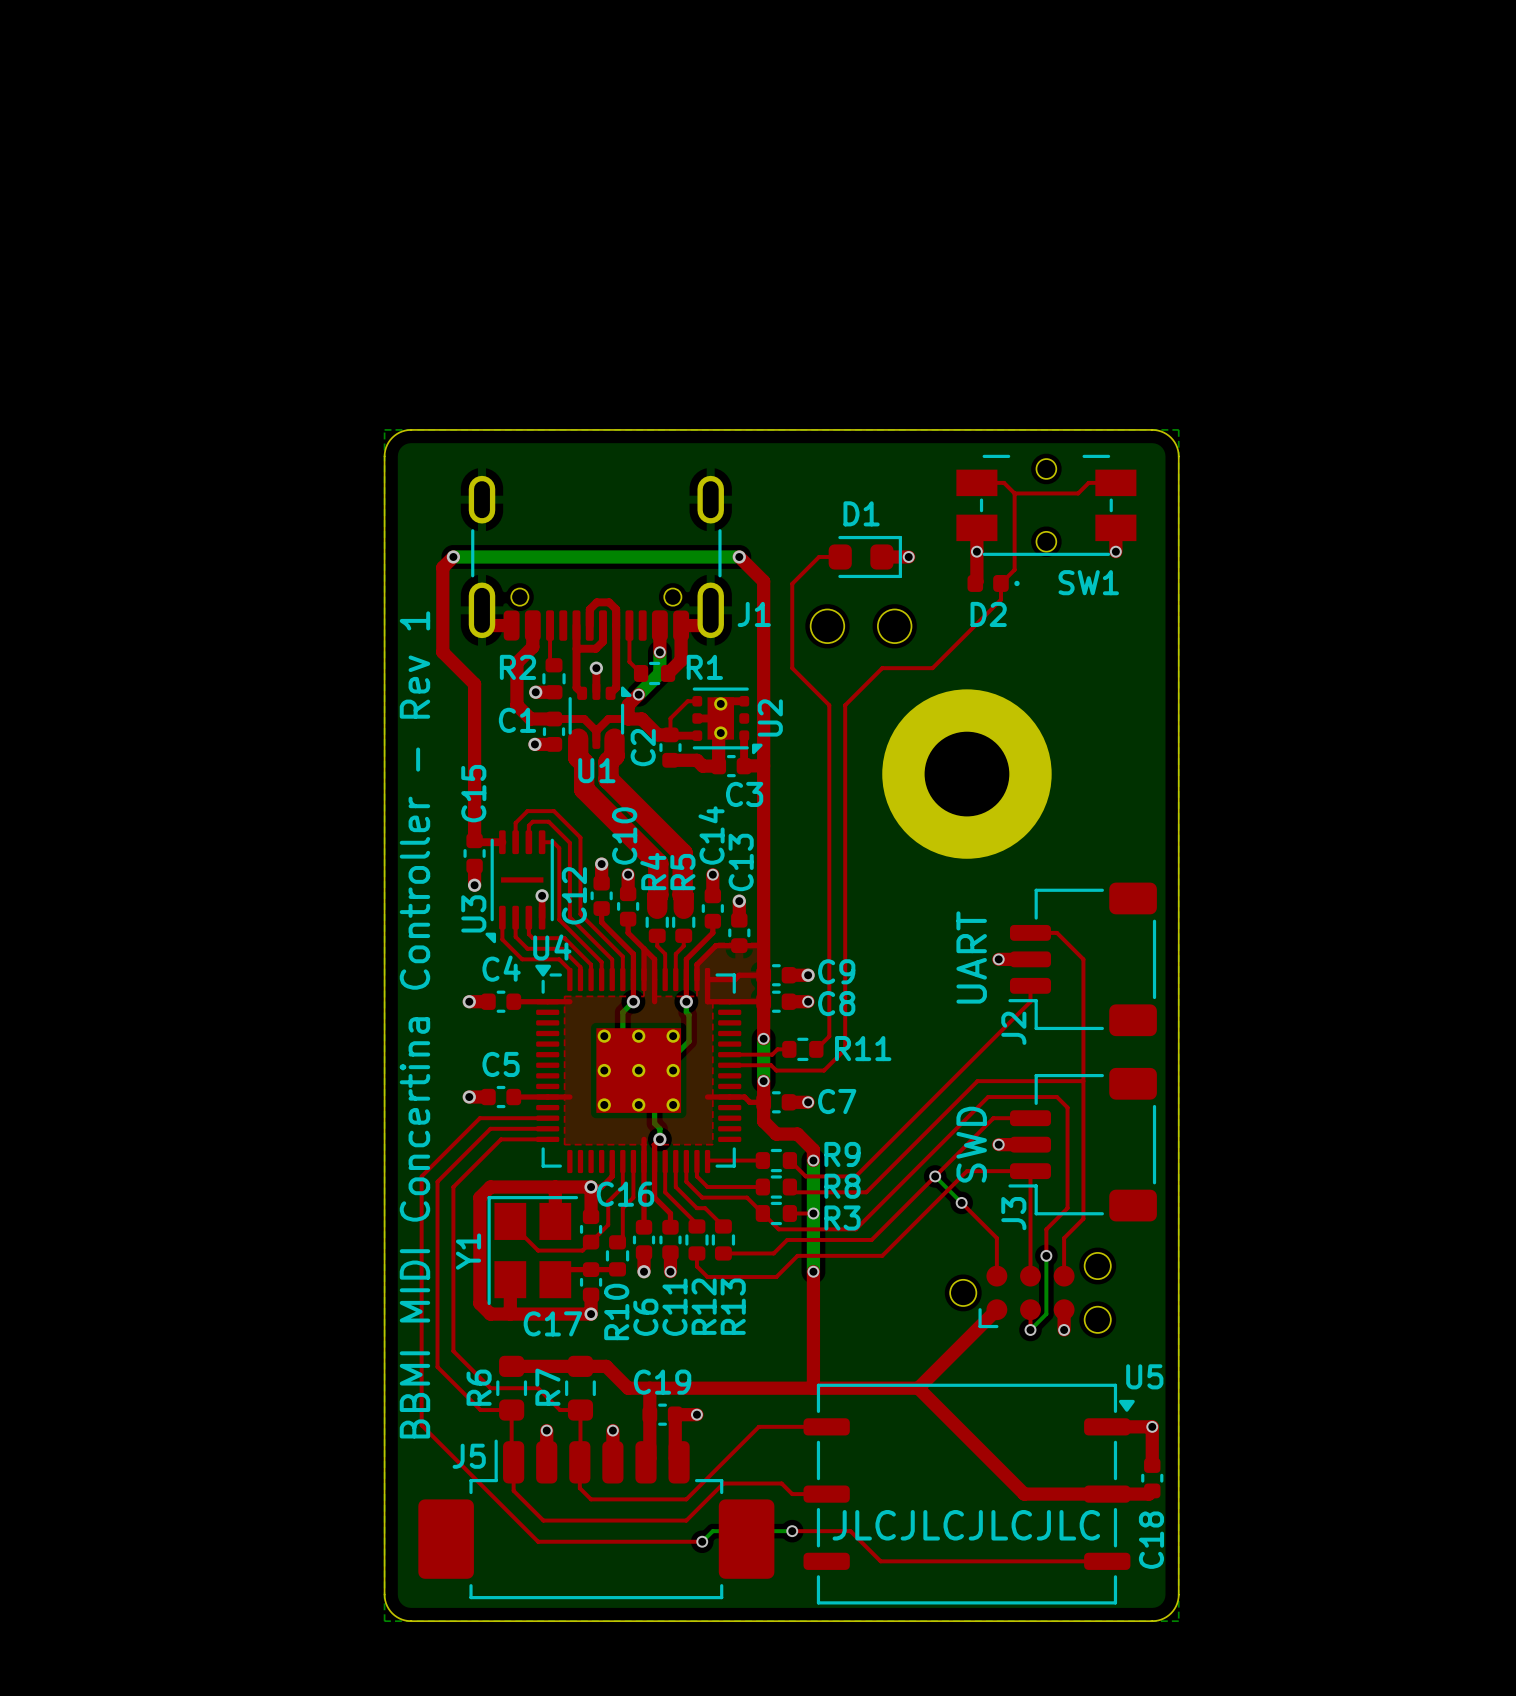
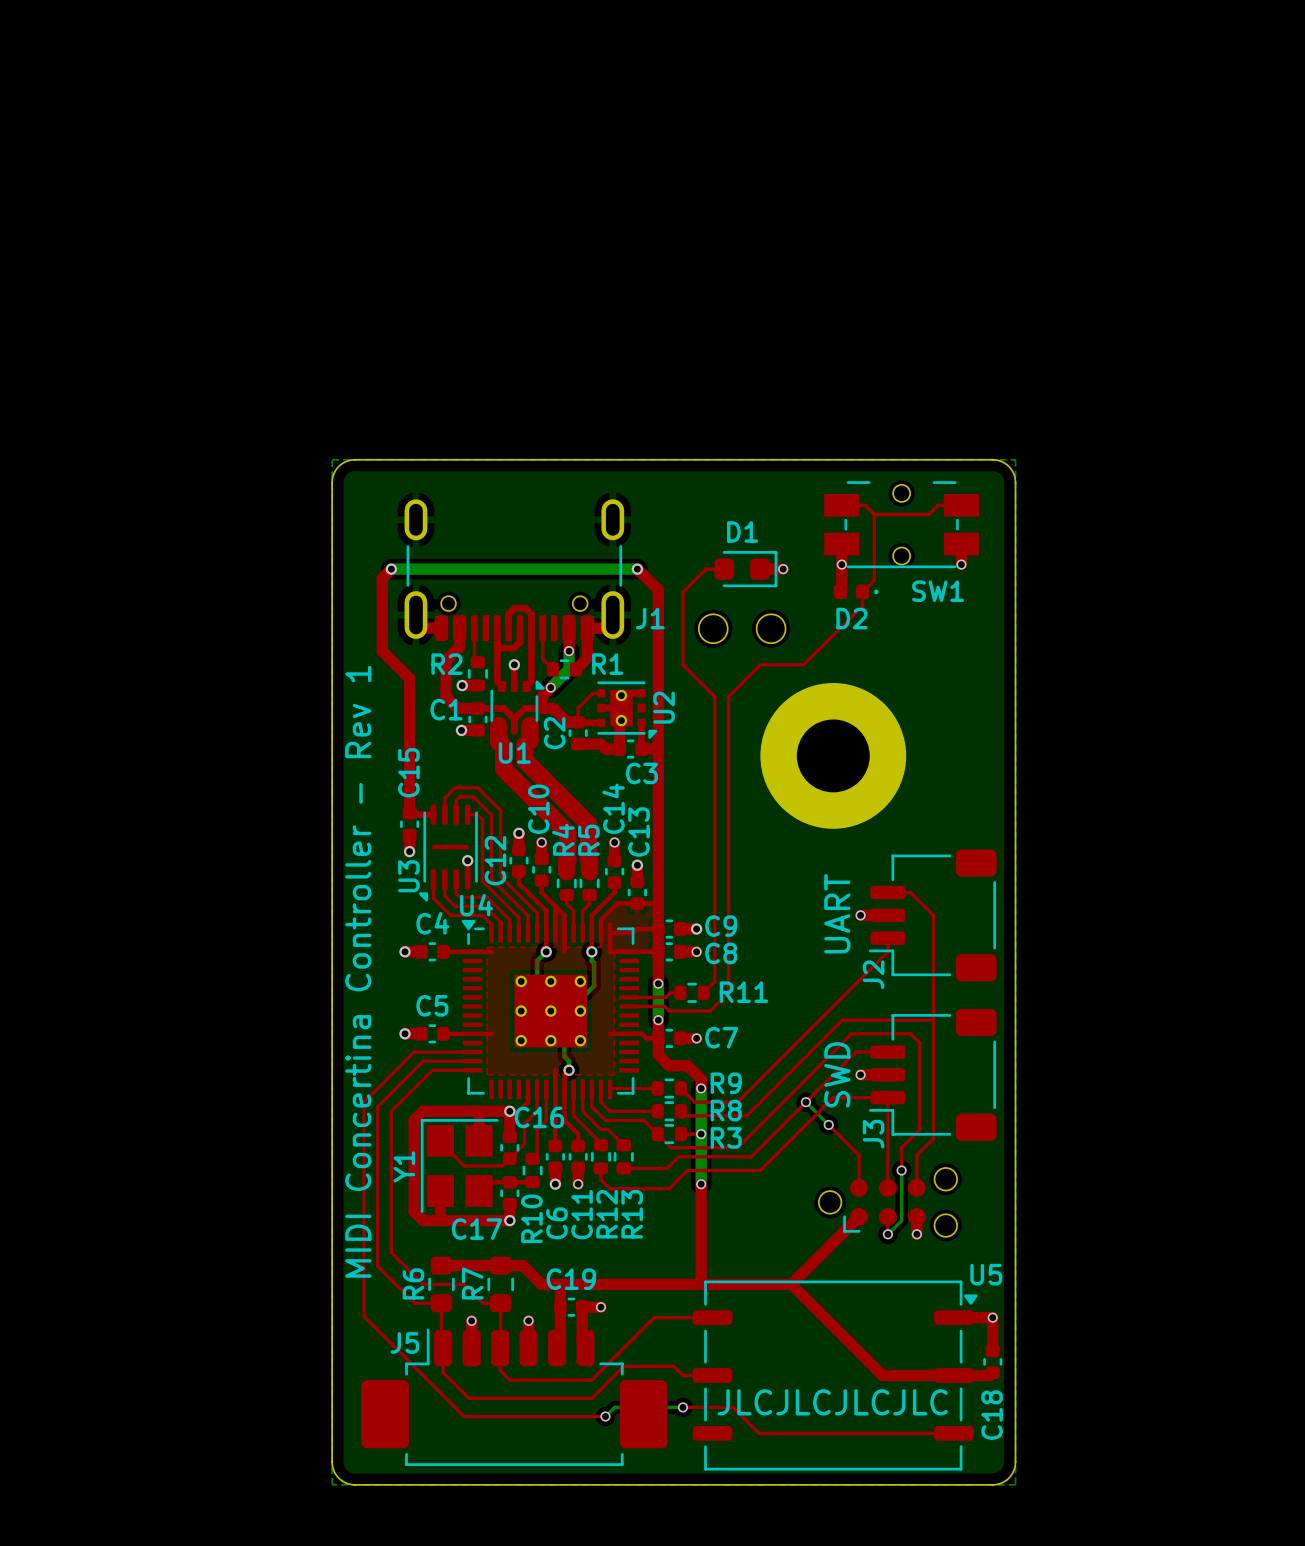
text: BBMI MIDI Concertina Controller - Rev 1 (414, 1024) -> MIDI Concertina Controller - Rev 1 (358, 971)

